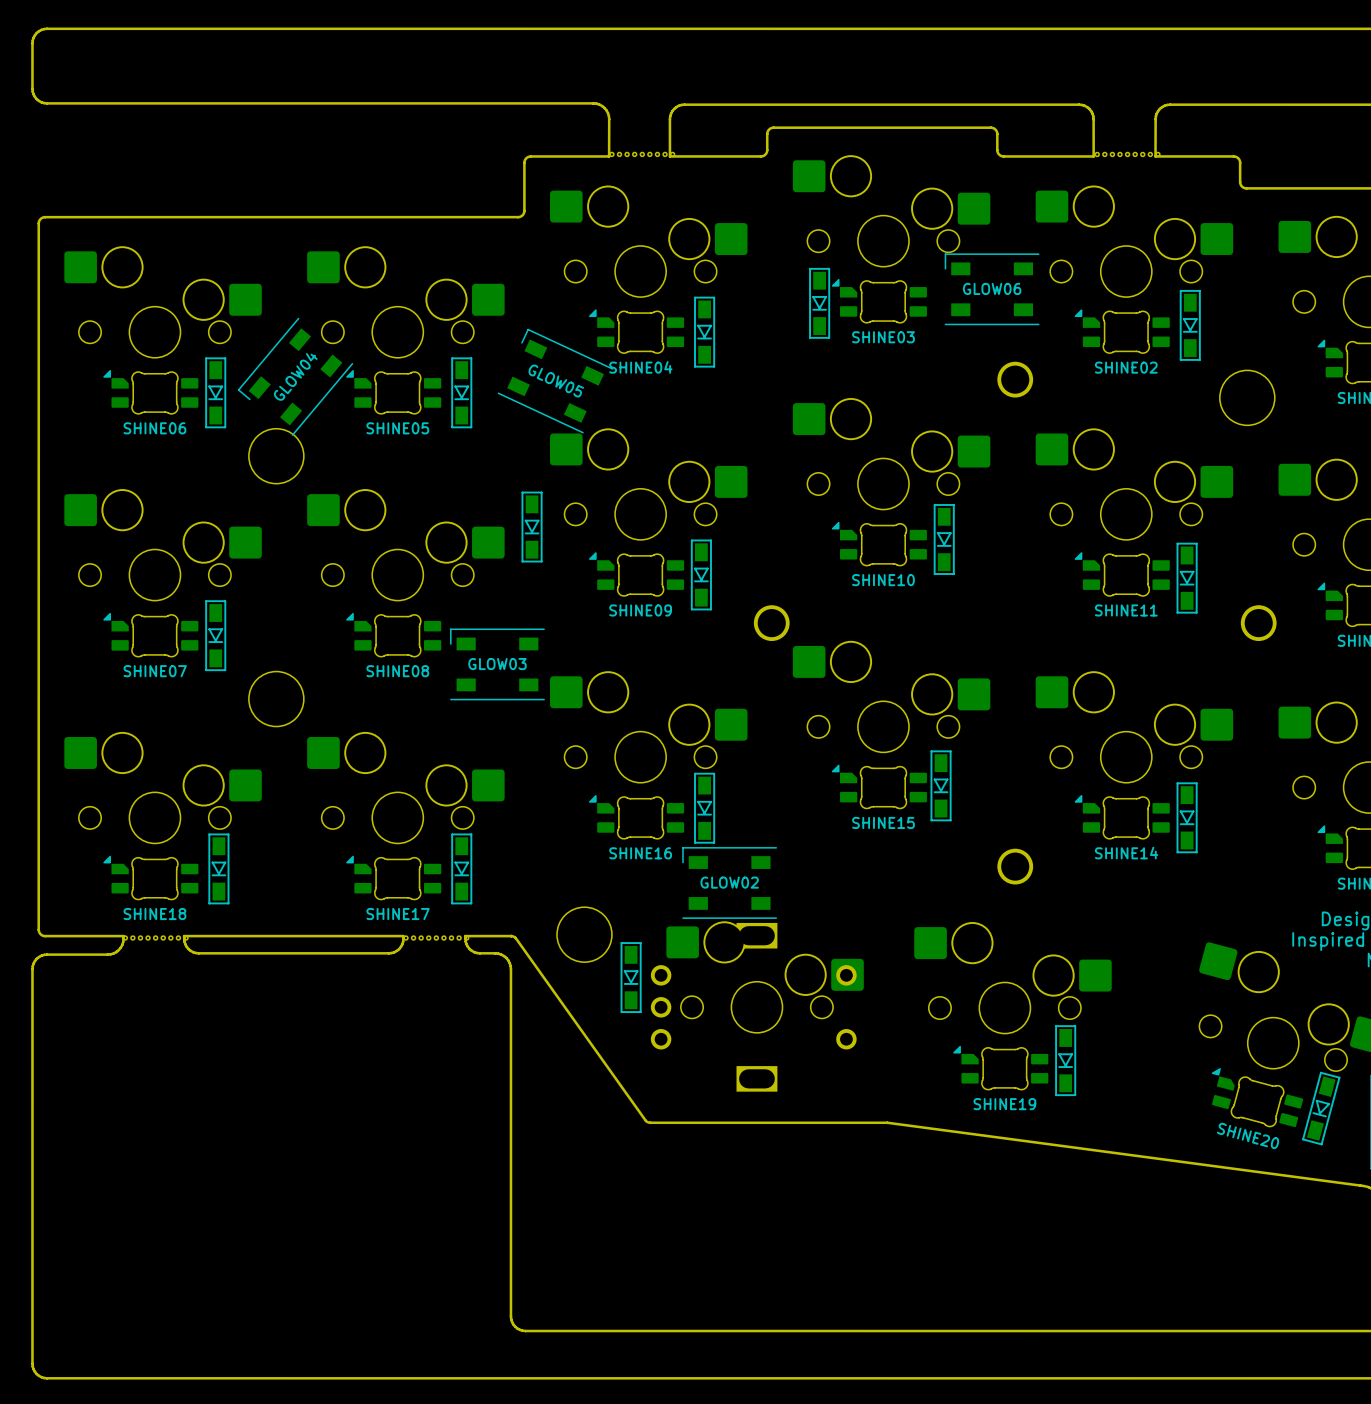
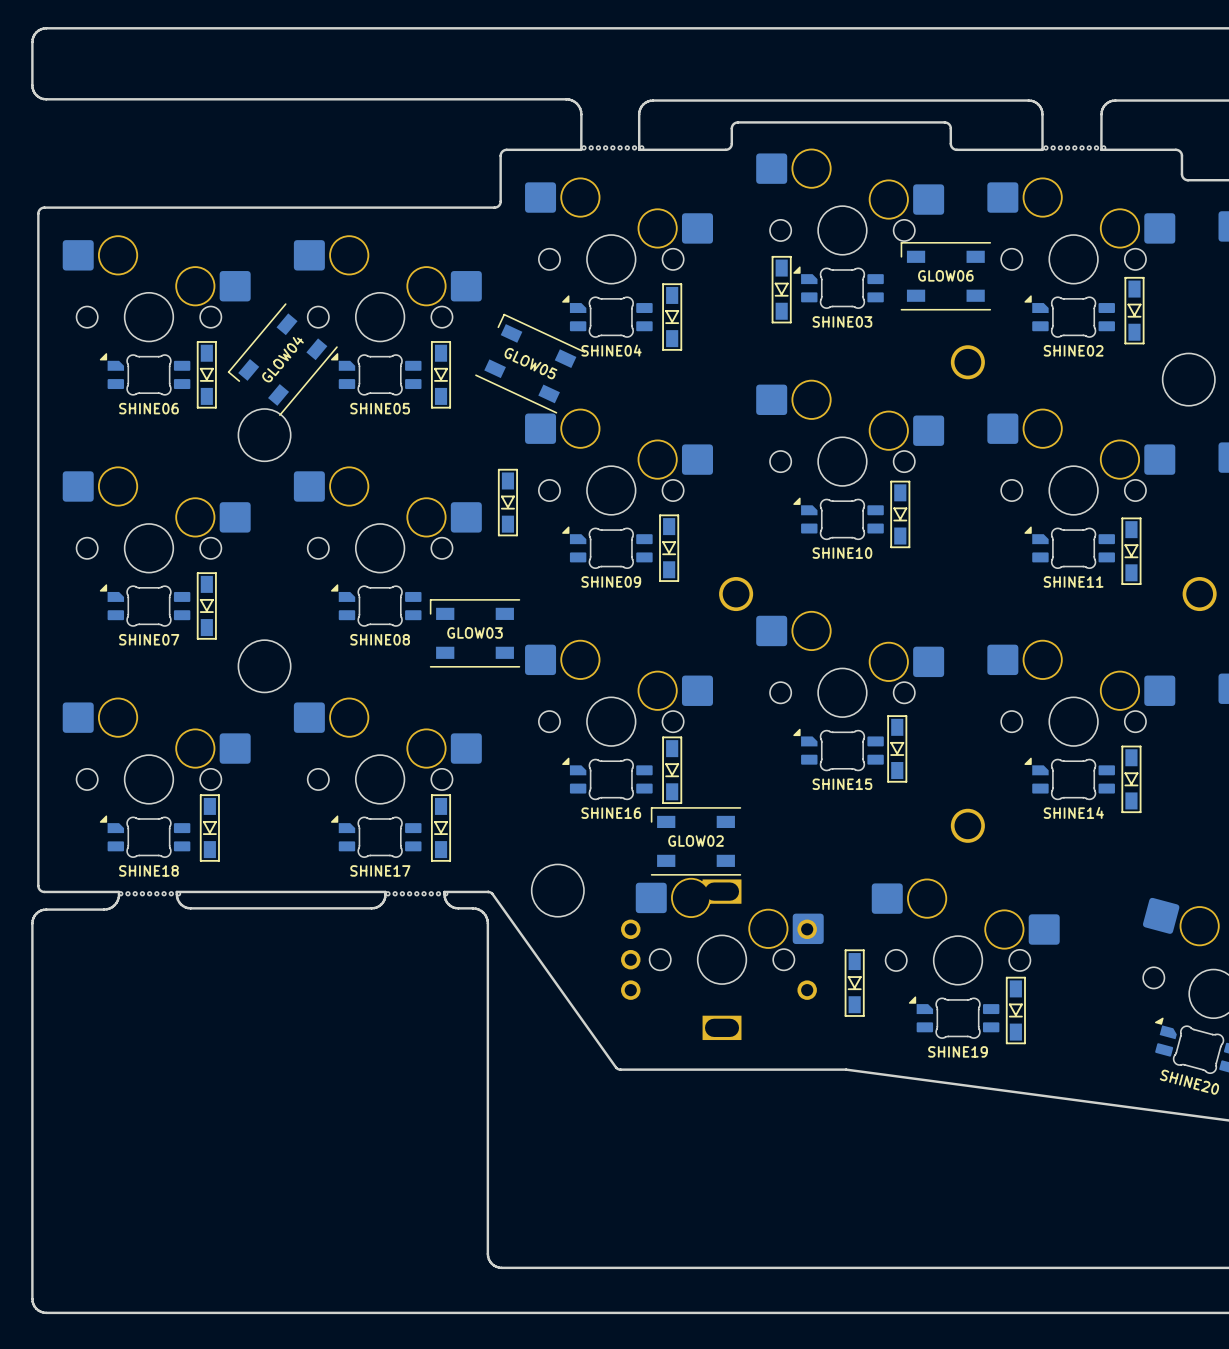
part position: (631, 977) -> (854, 983)

